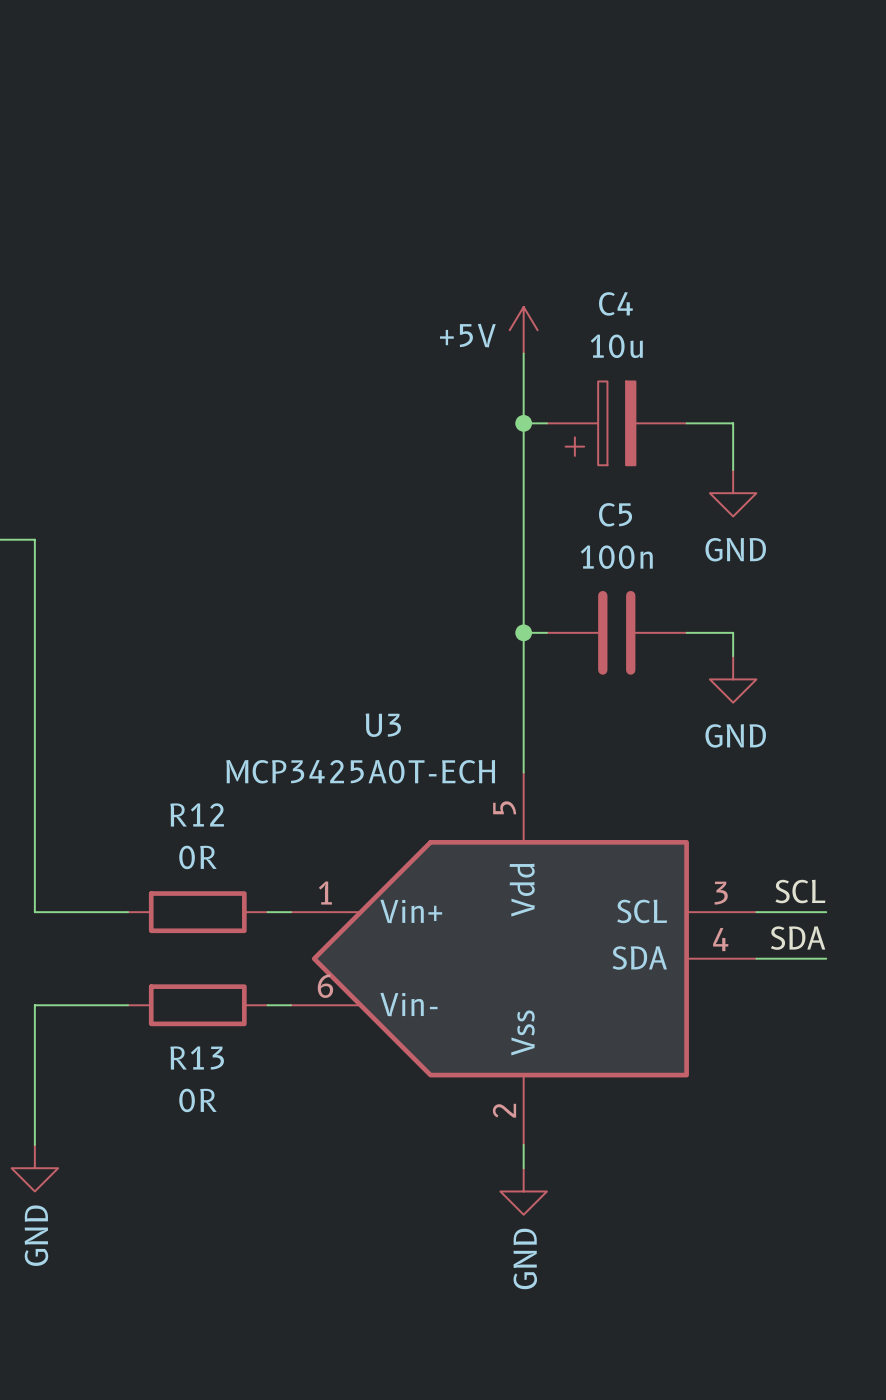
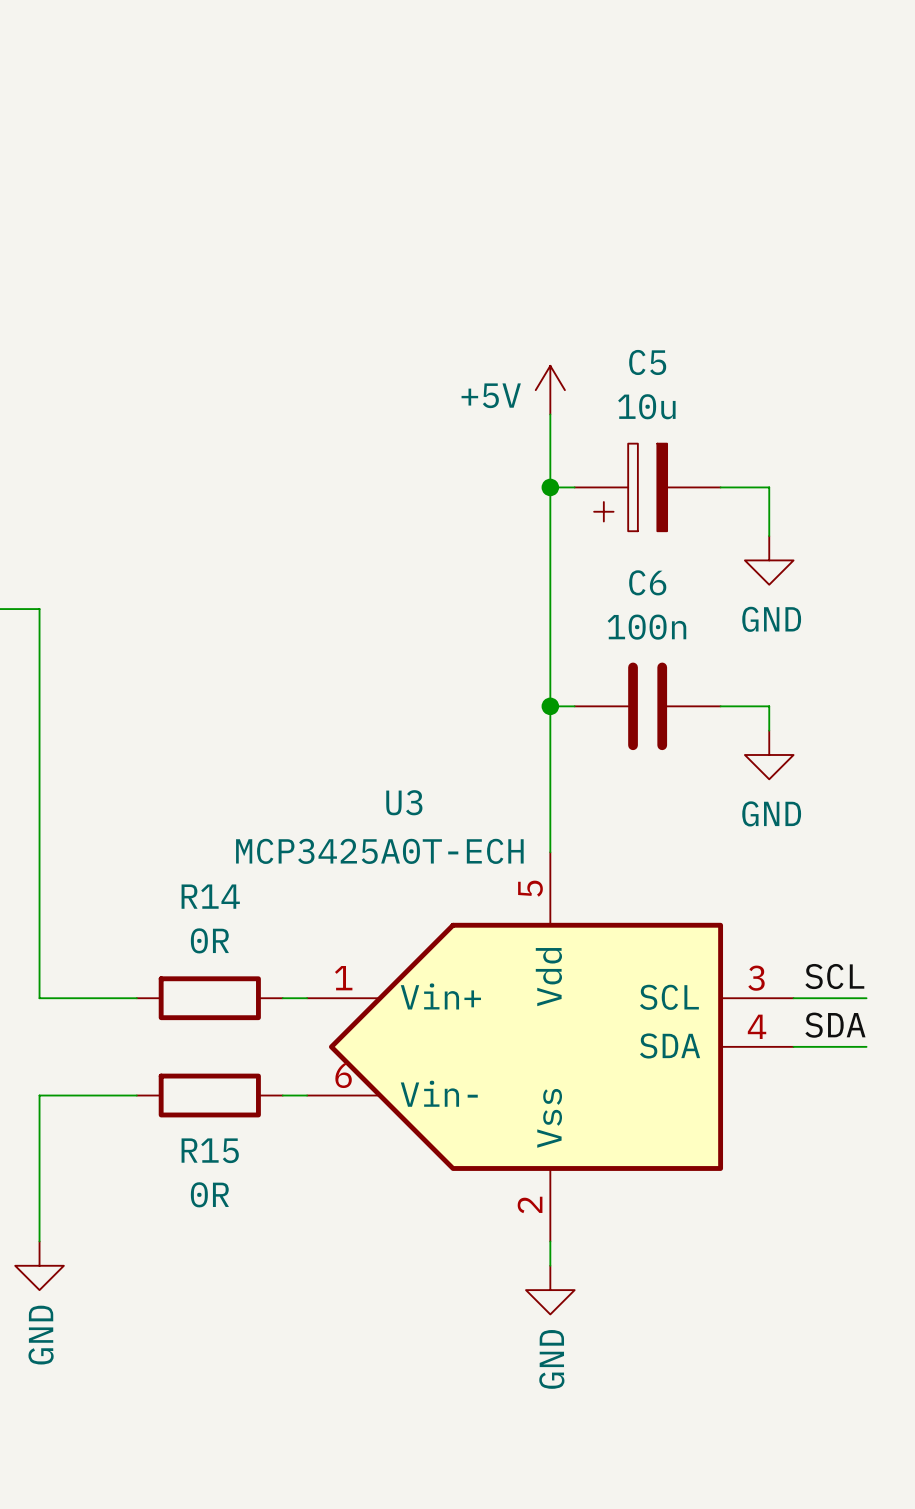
C4 name: C4 (615, 303) -> C5 (647, 362)
C5 name: C5 (615, 514) -> C6 (647, 582)
R12 name: R12 (197, 814) -> R14 (210, 896)
R13 name: R13 (197, 1057) -> R15 (210, 1150)

